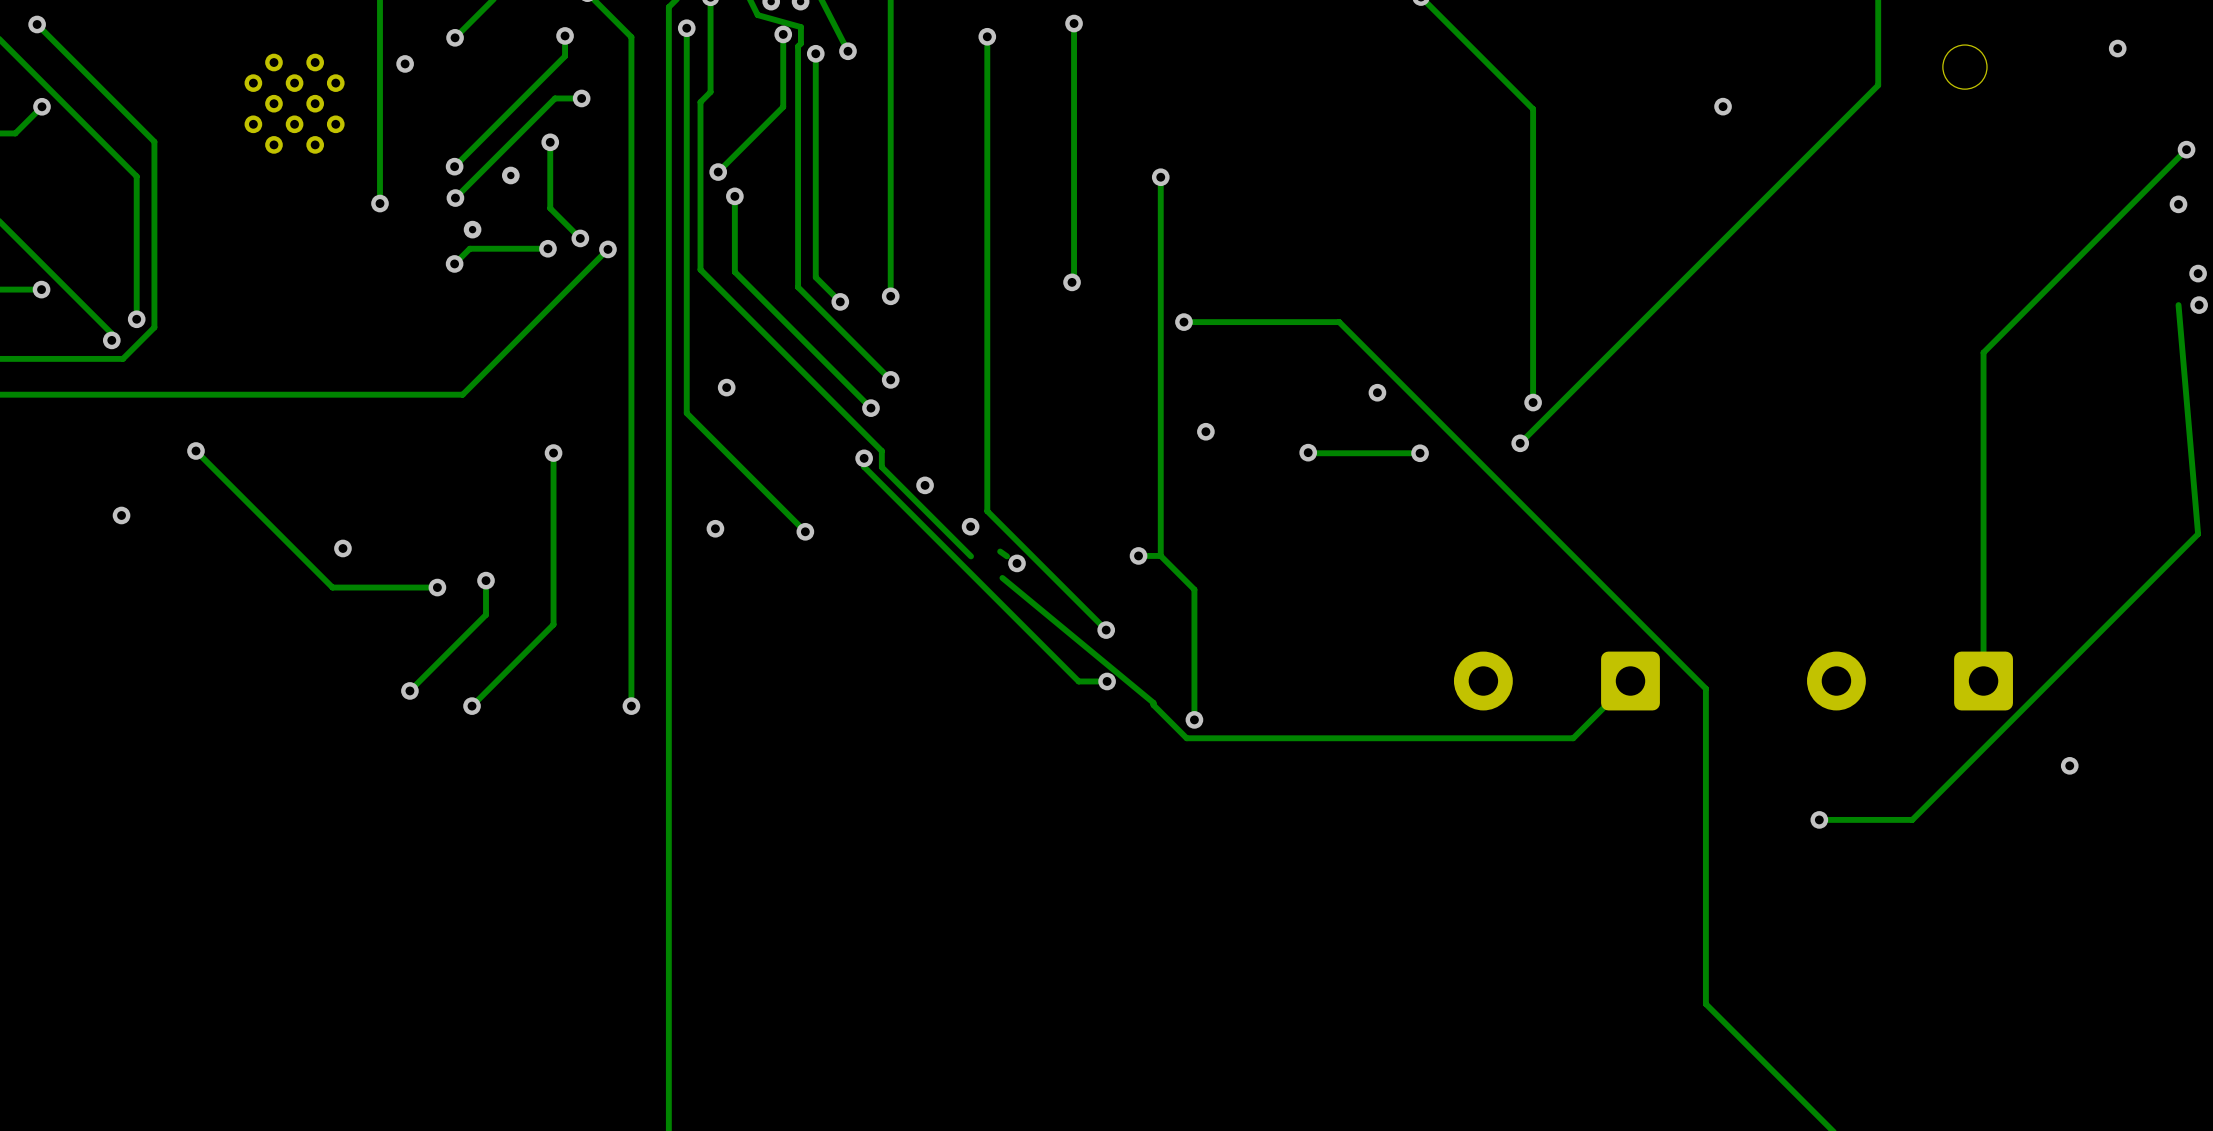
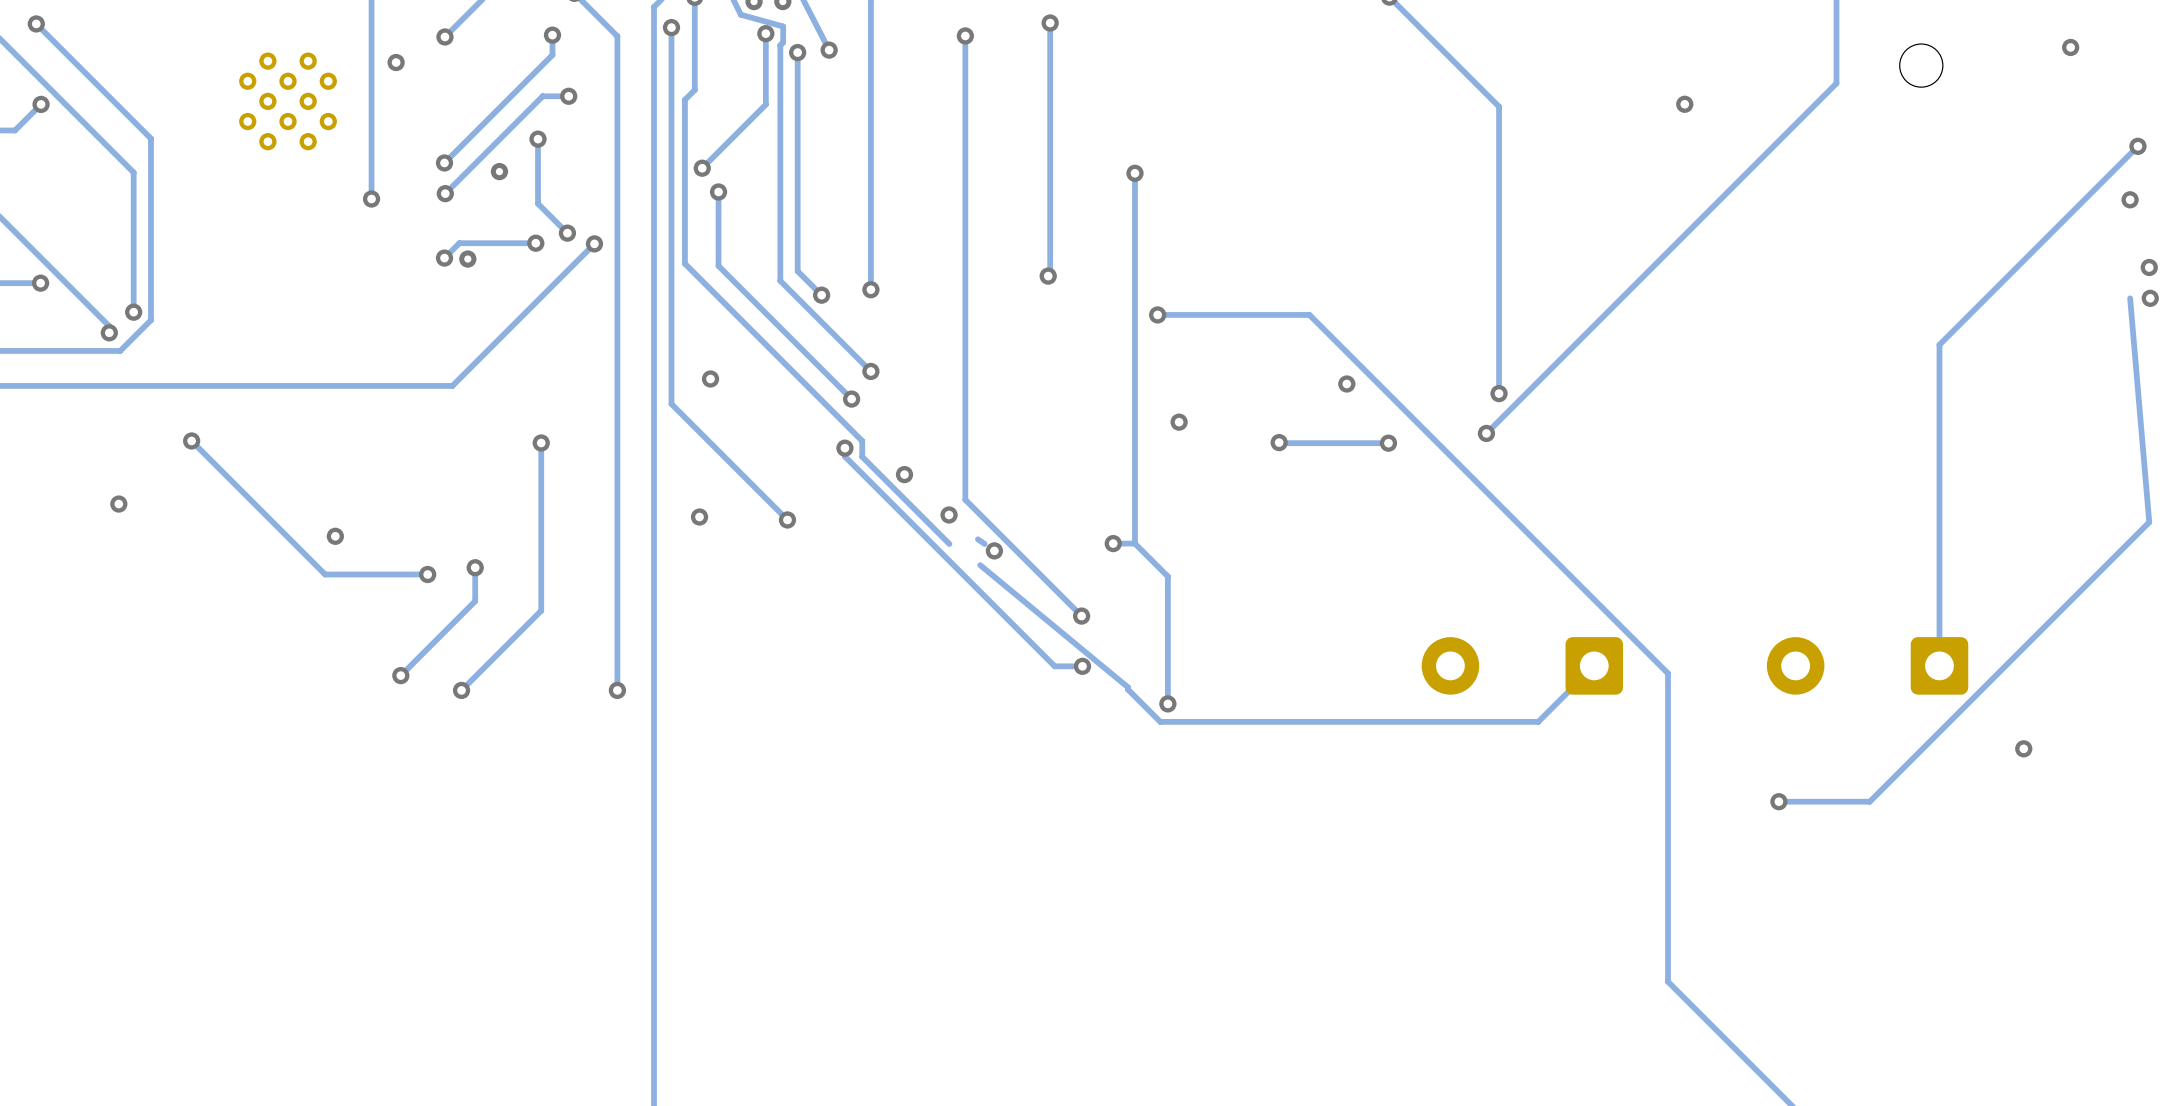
via position: (472, 229) -> (467, 259)

